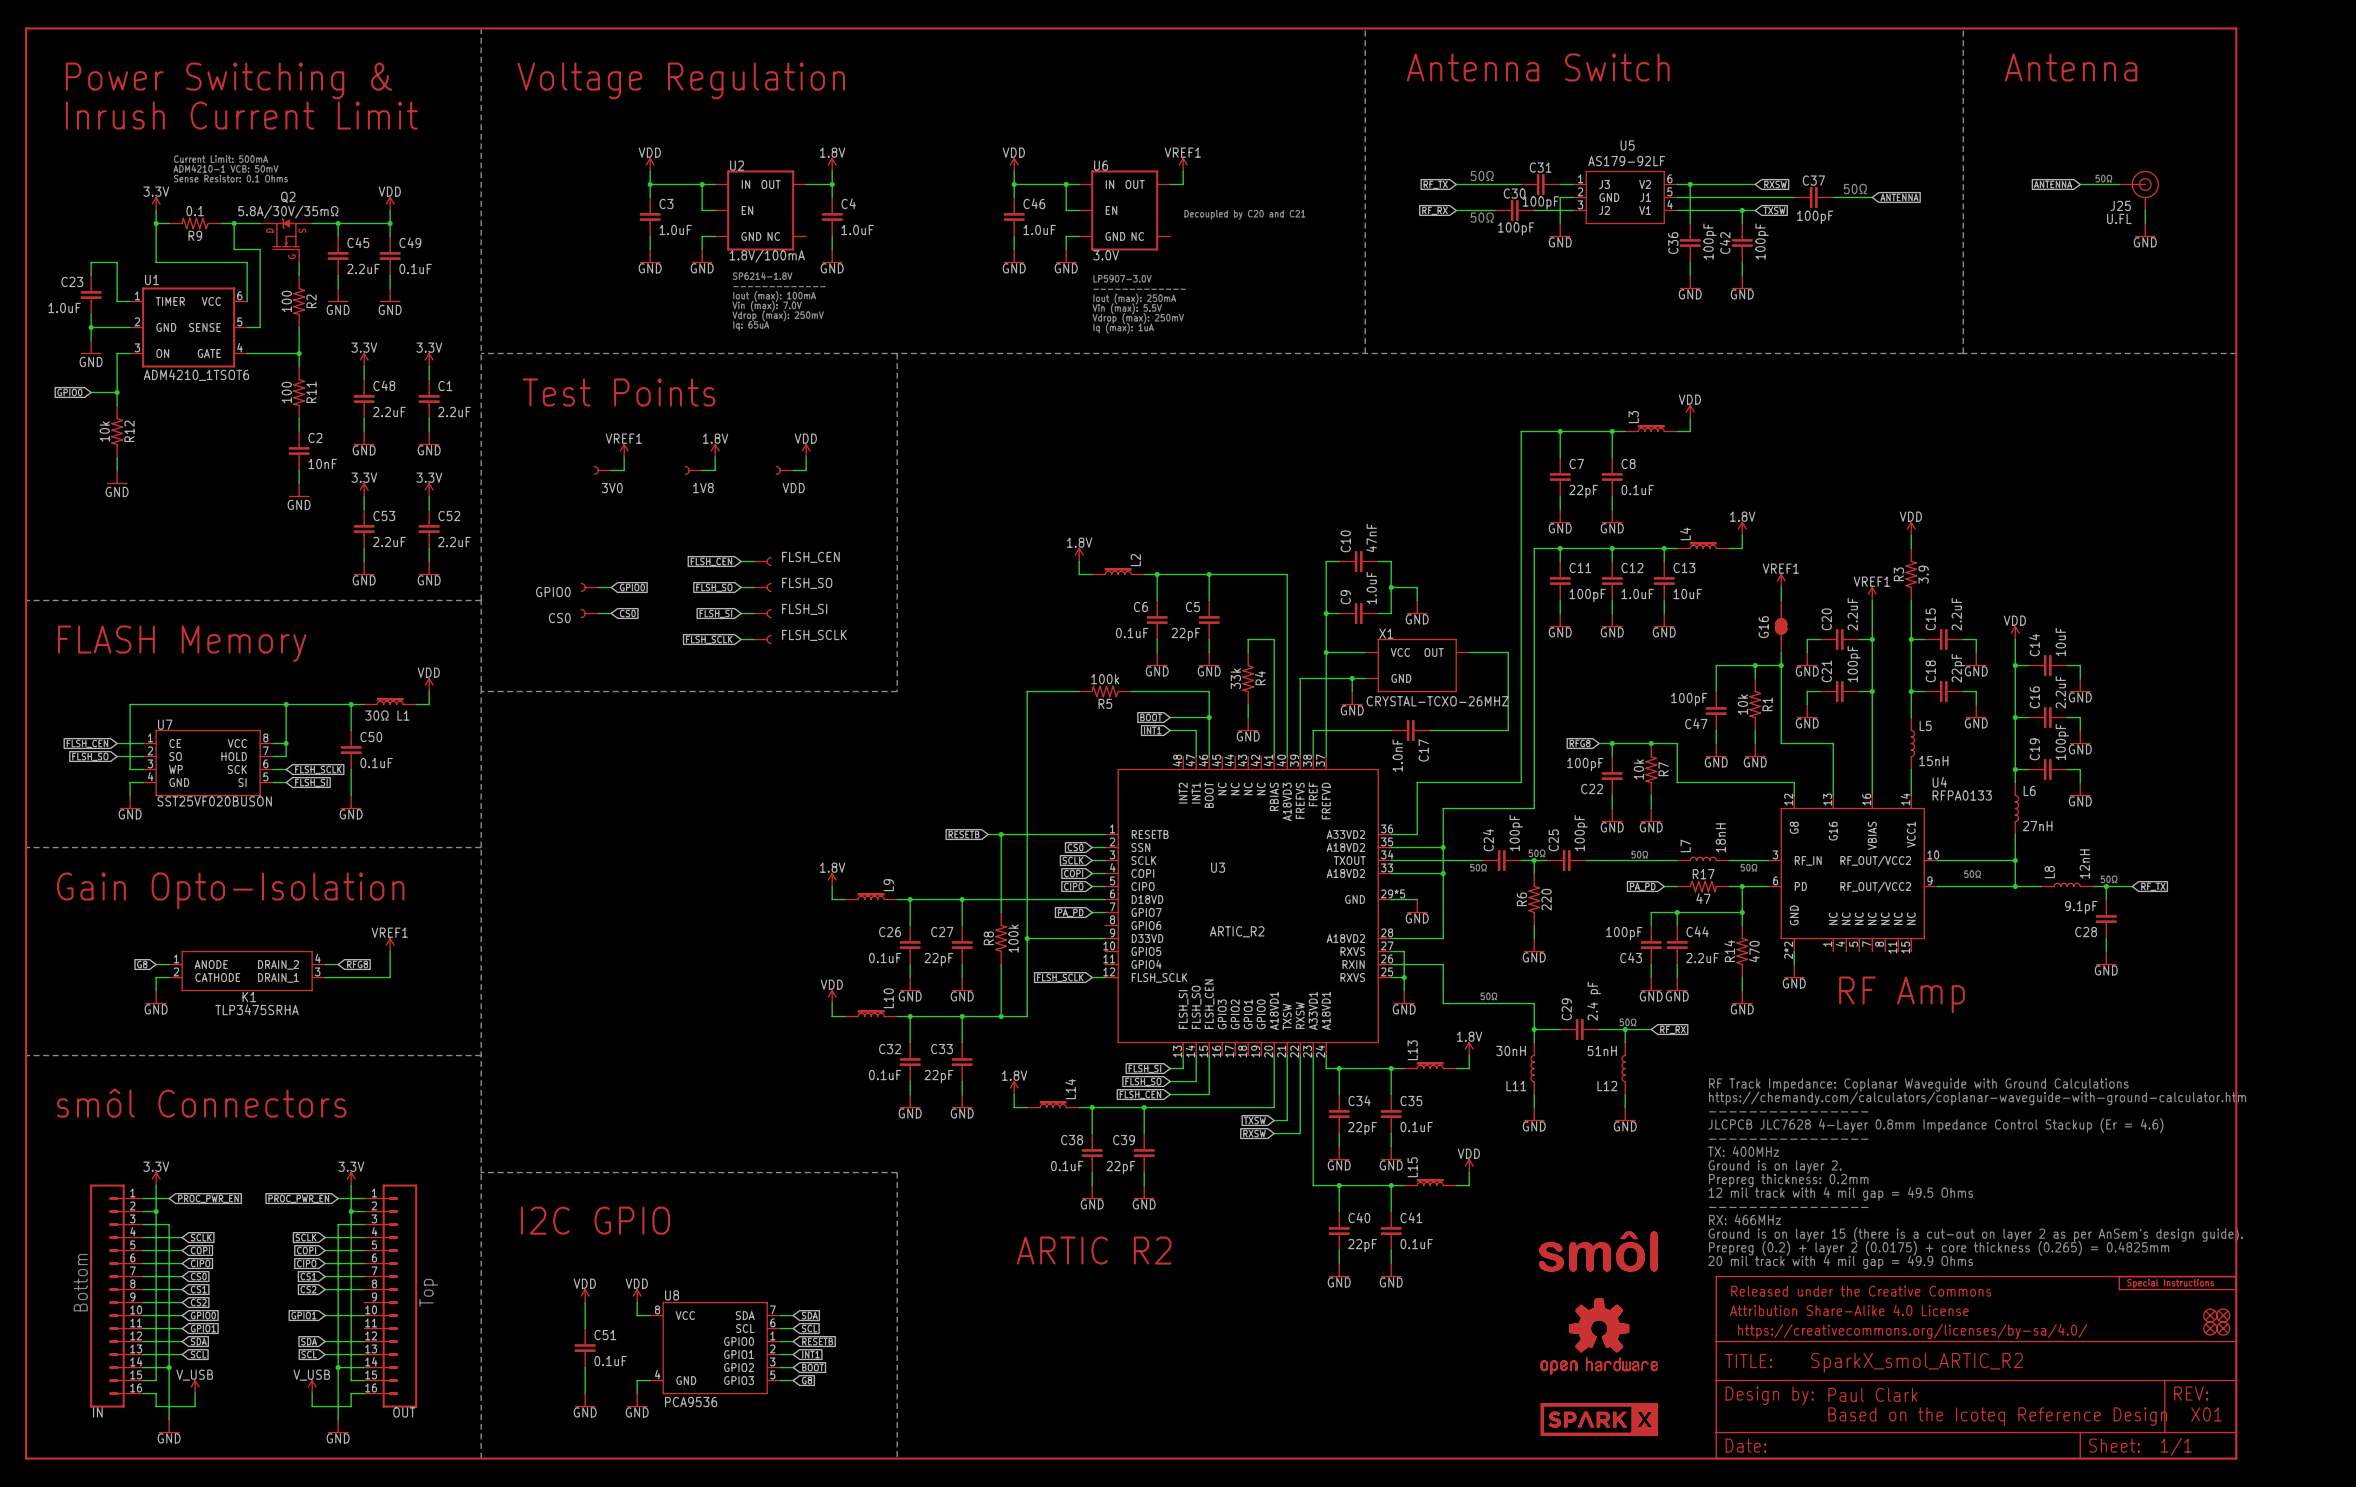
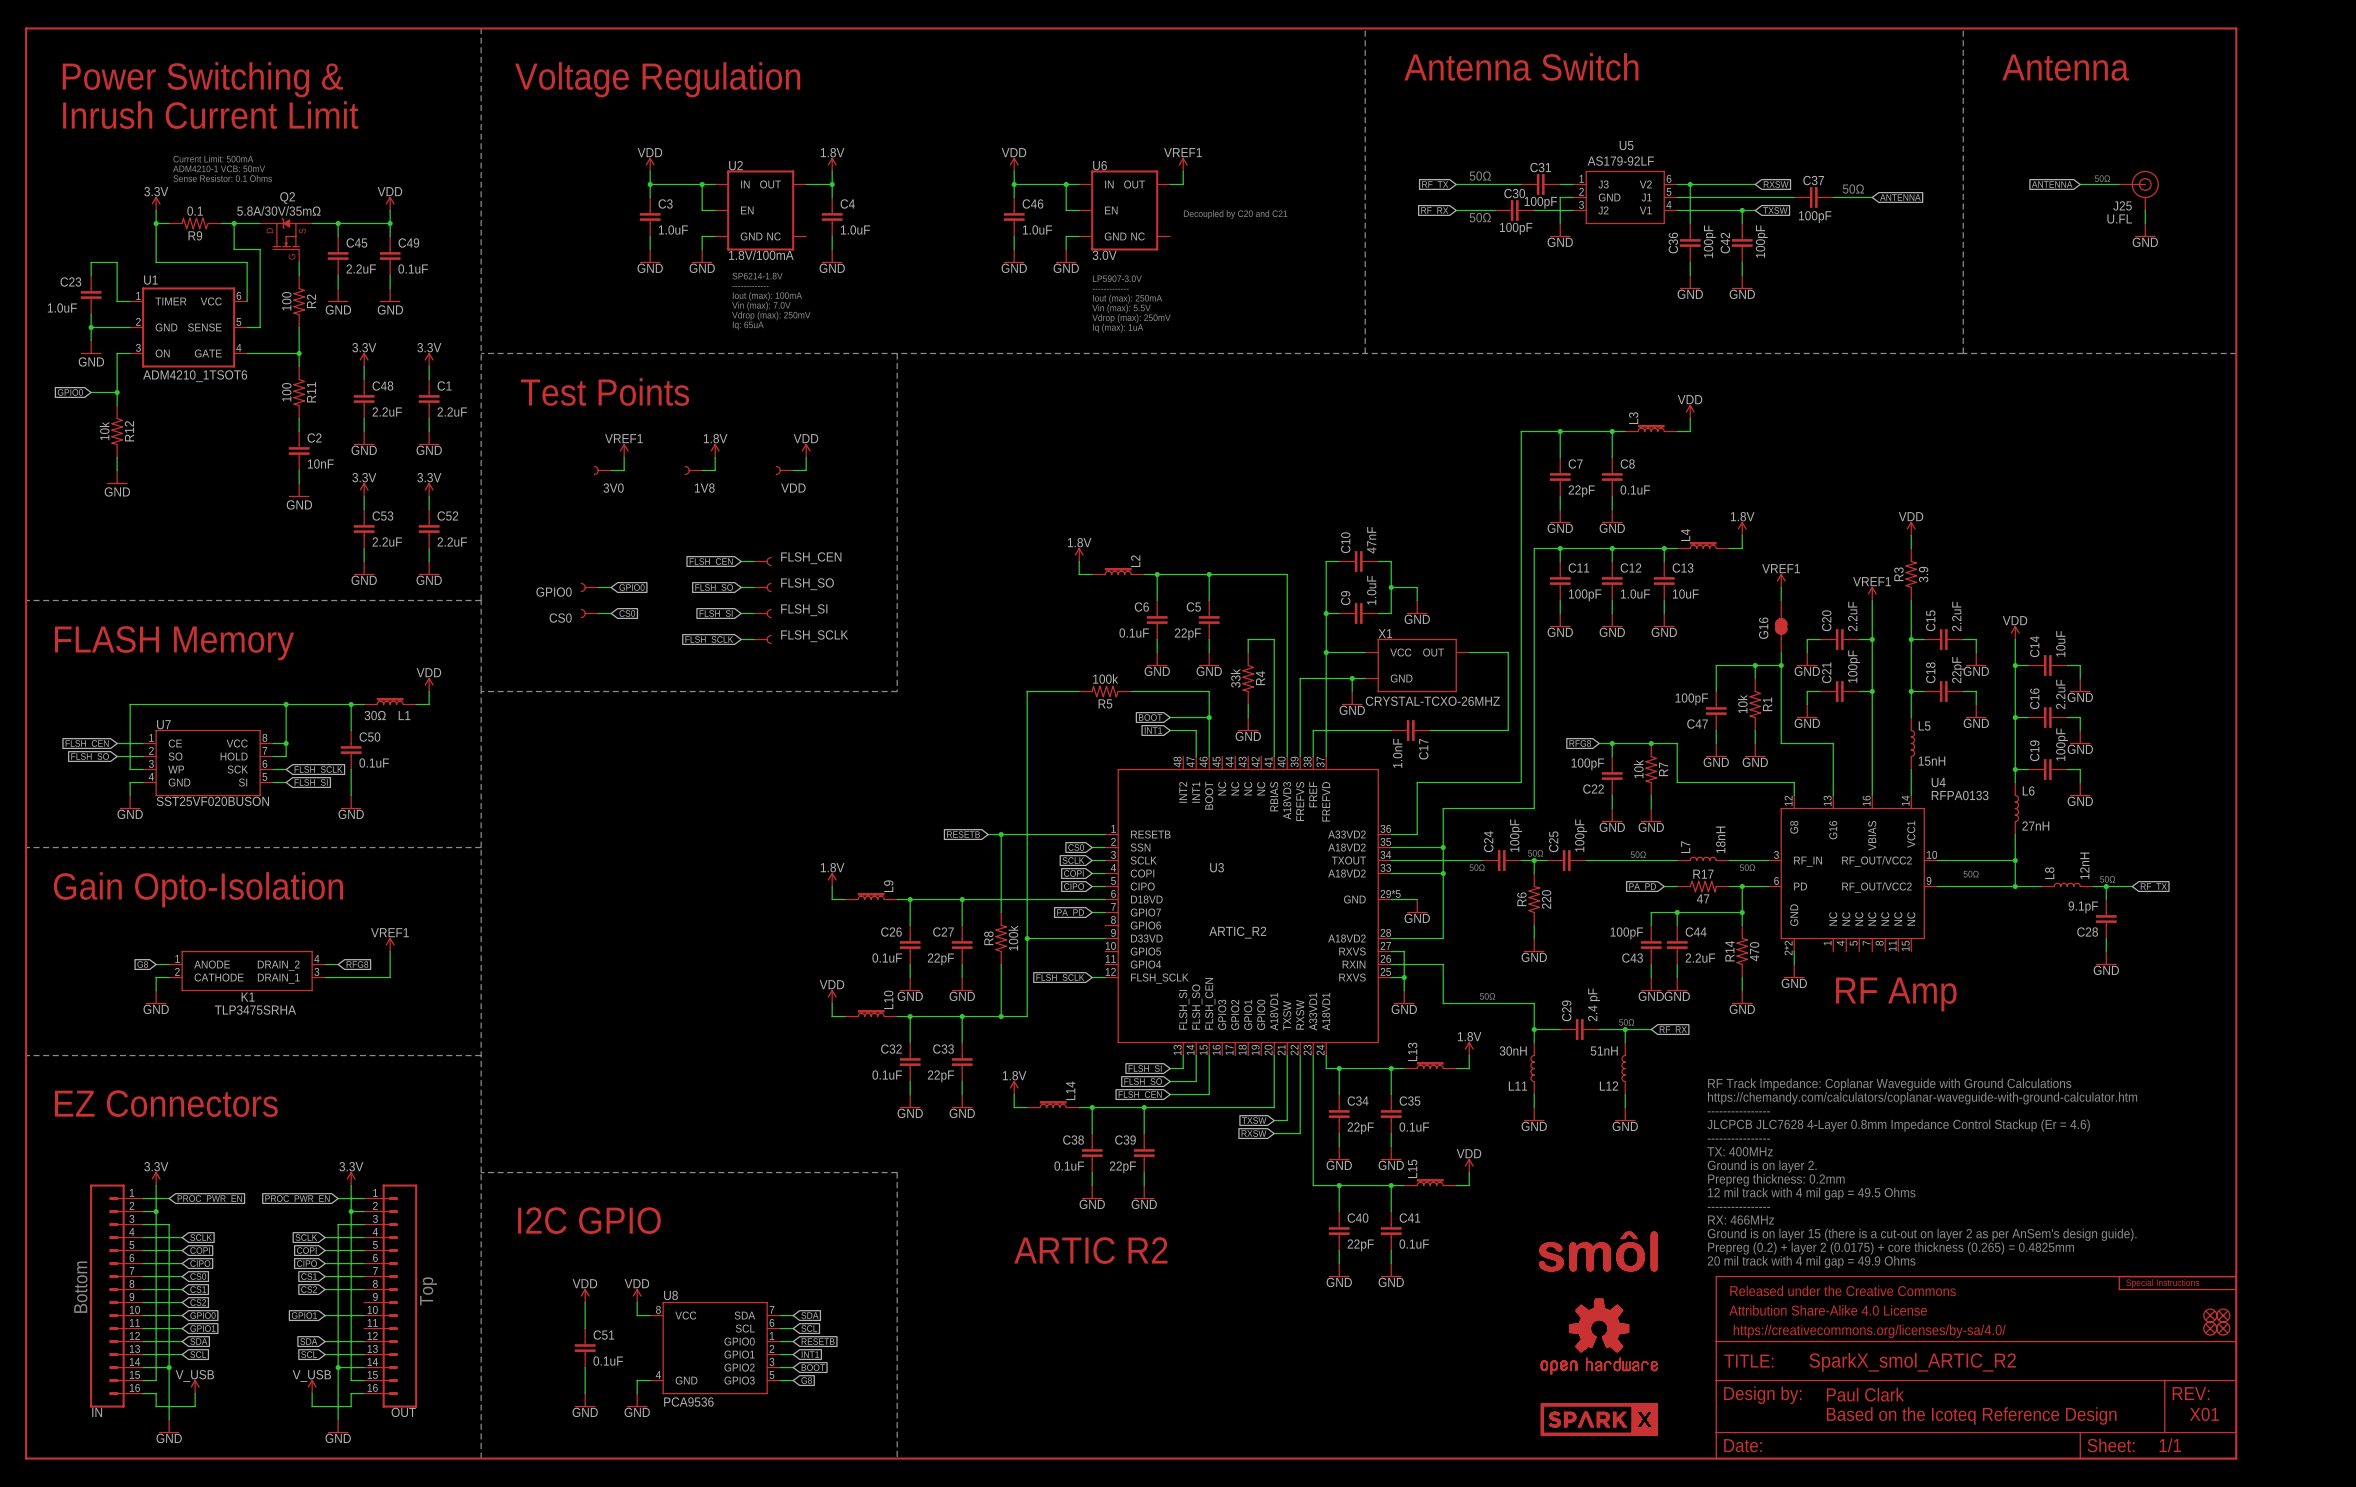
text: smôl Connectors (201, 1103) -> EZ Connectors (166, 1103)

